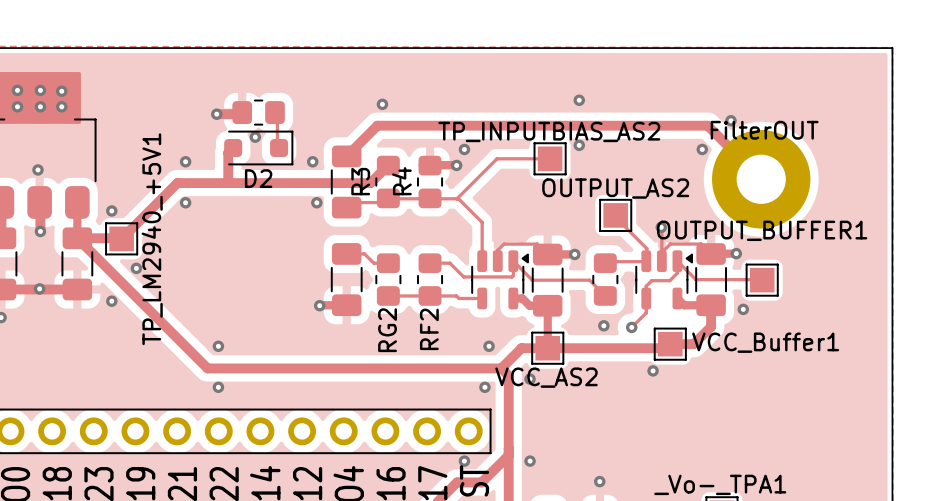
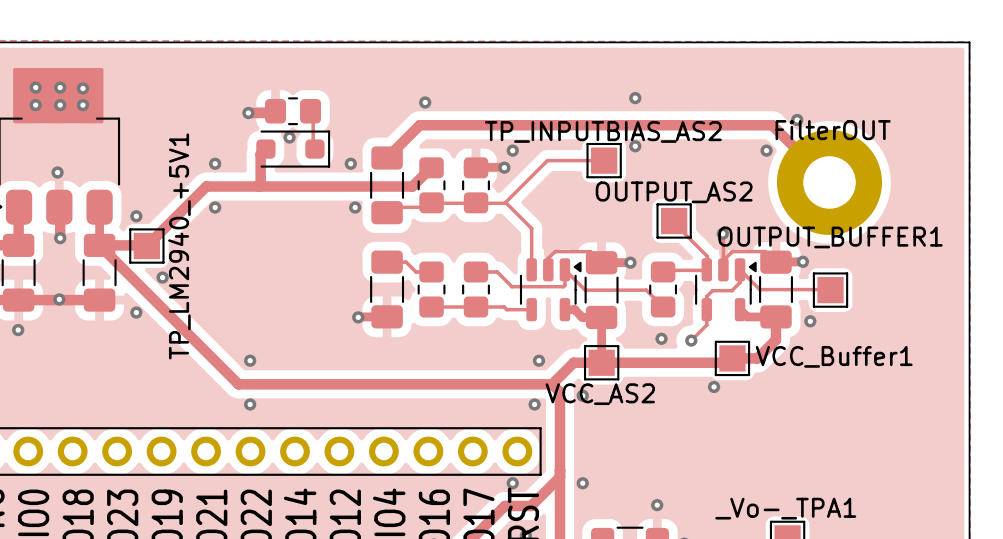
D2 name: D2 (258, 178) -> none
R3 name: R3 (360, 181) -> none
R4 name: R4 (401, 181) -> none
RF2 name: RF2 (429, 329) -> none
RG2 name: RG2 (387, 330) -> none

